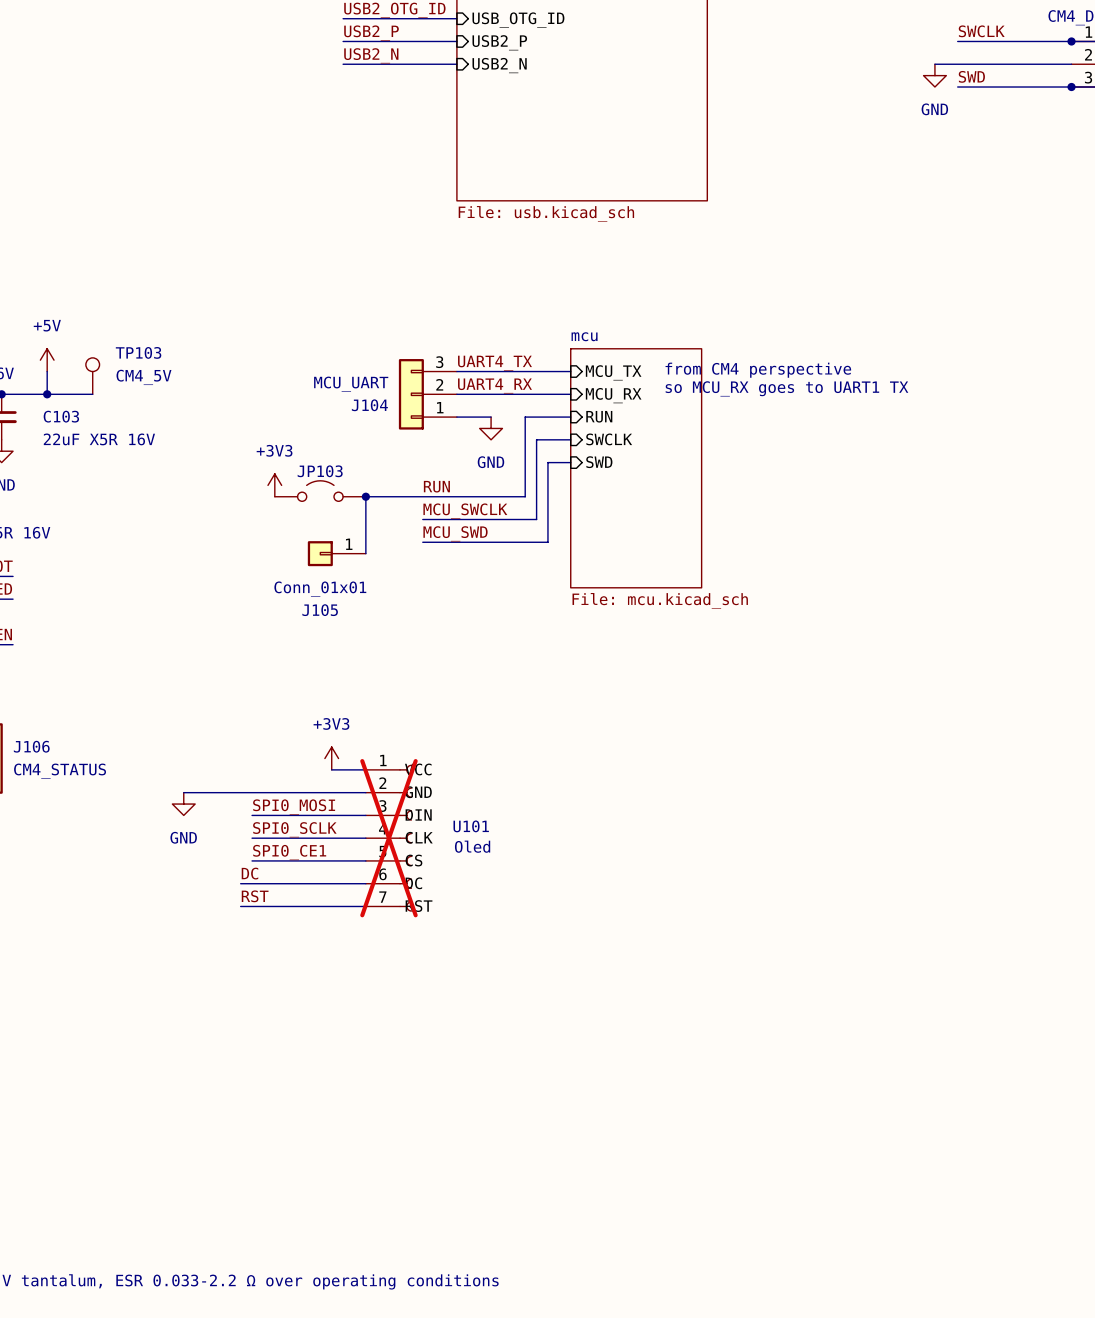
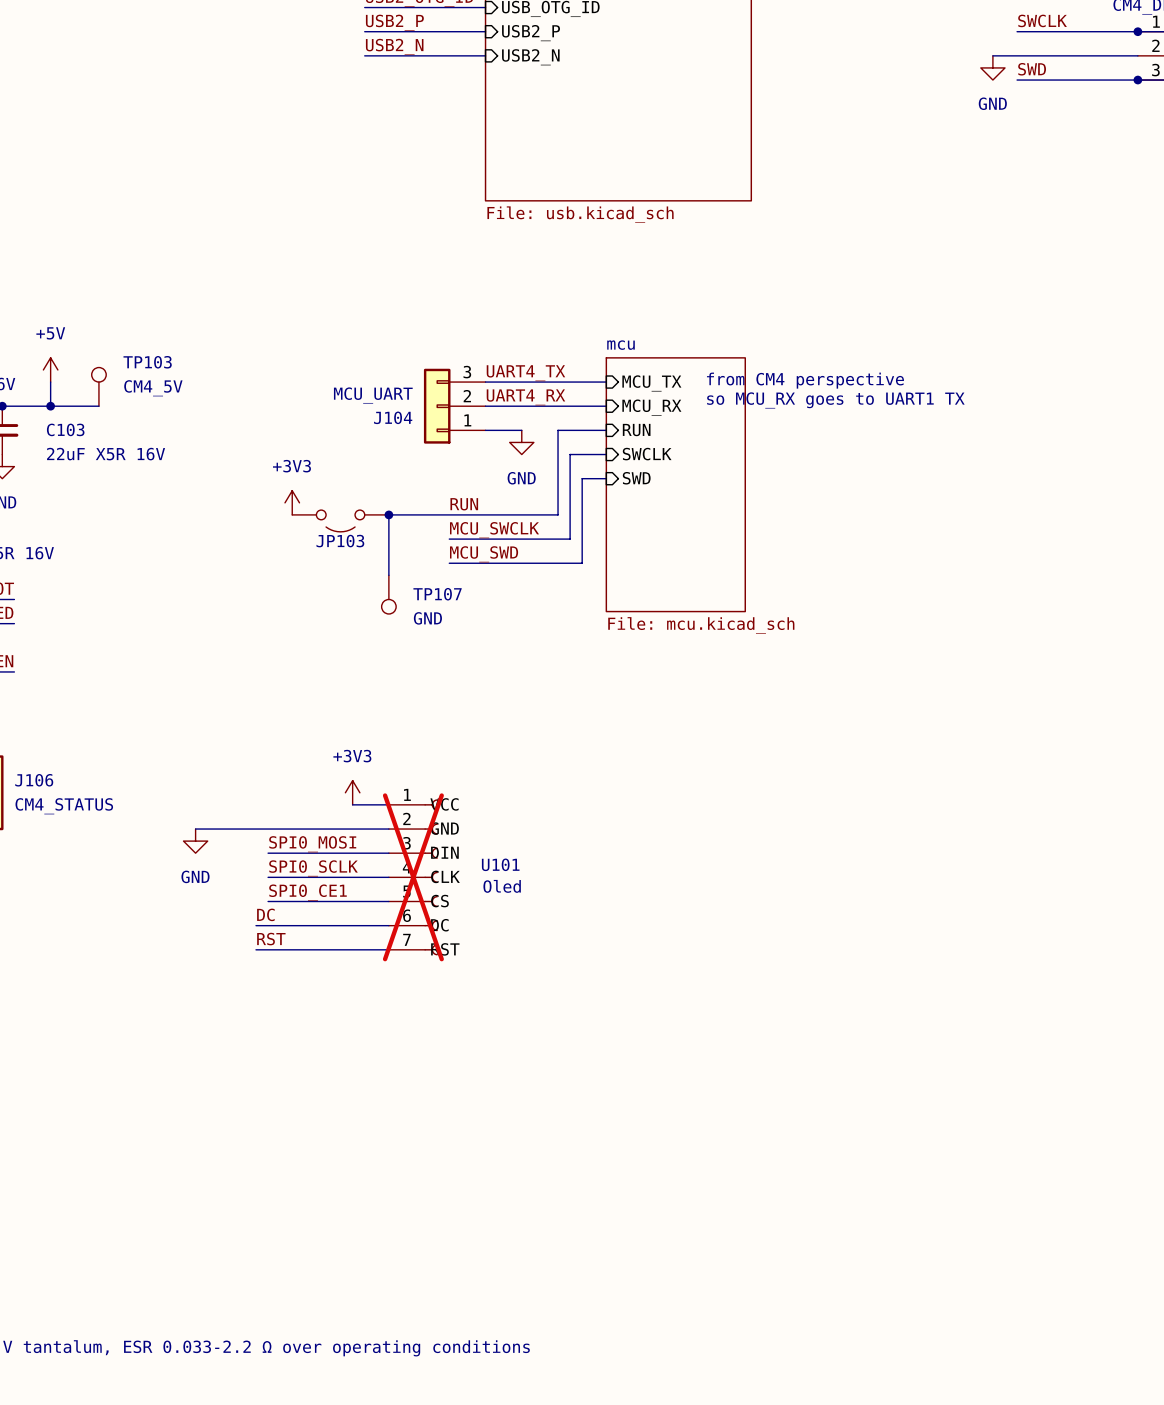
JP103 rotation: 0° (320, 491) -> 180° (340, 520)
J105: Conn_01x01 (336, 553) -> none
TP107: none -> GND (388, 594)

